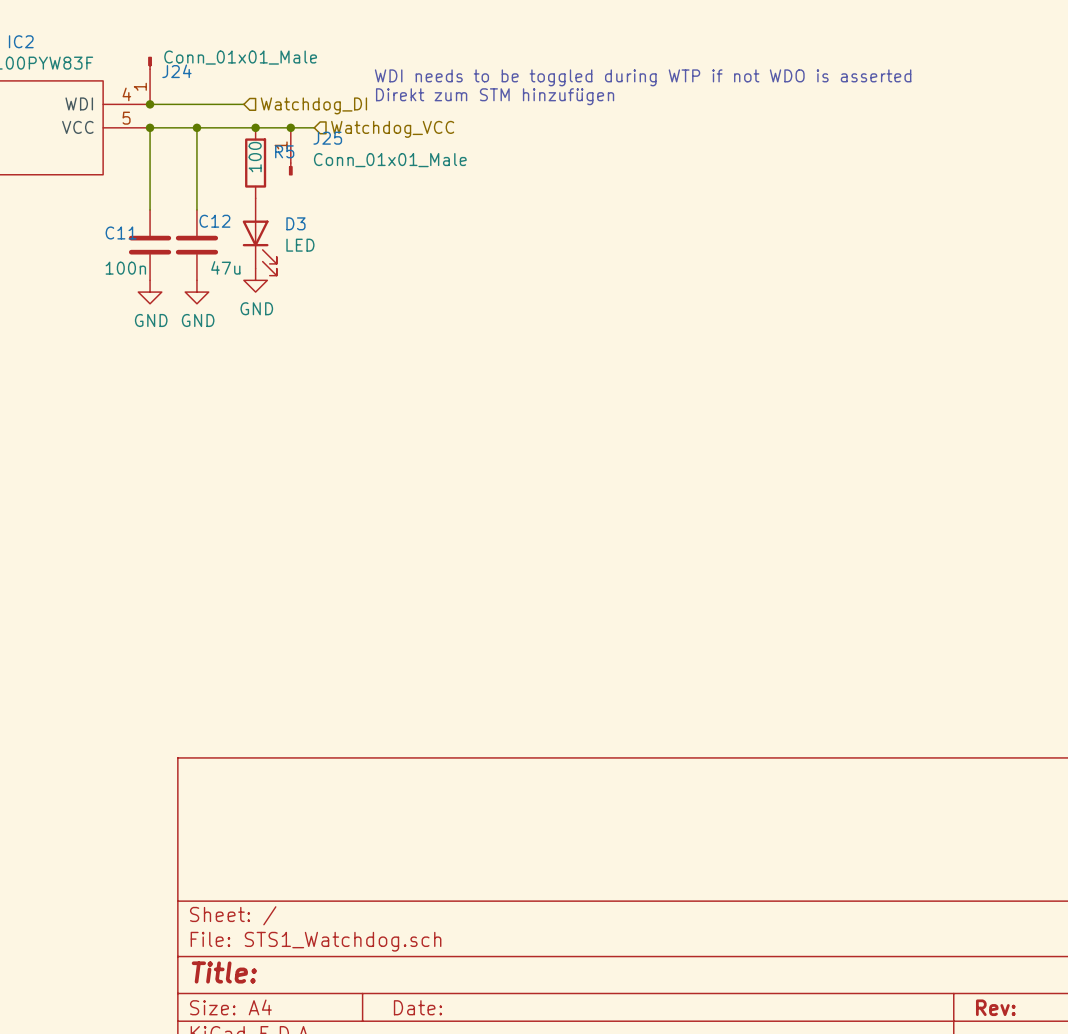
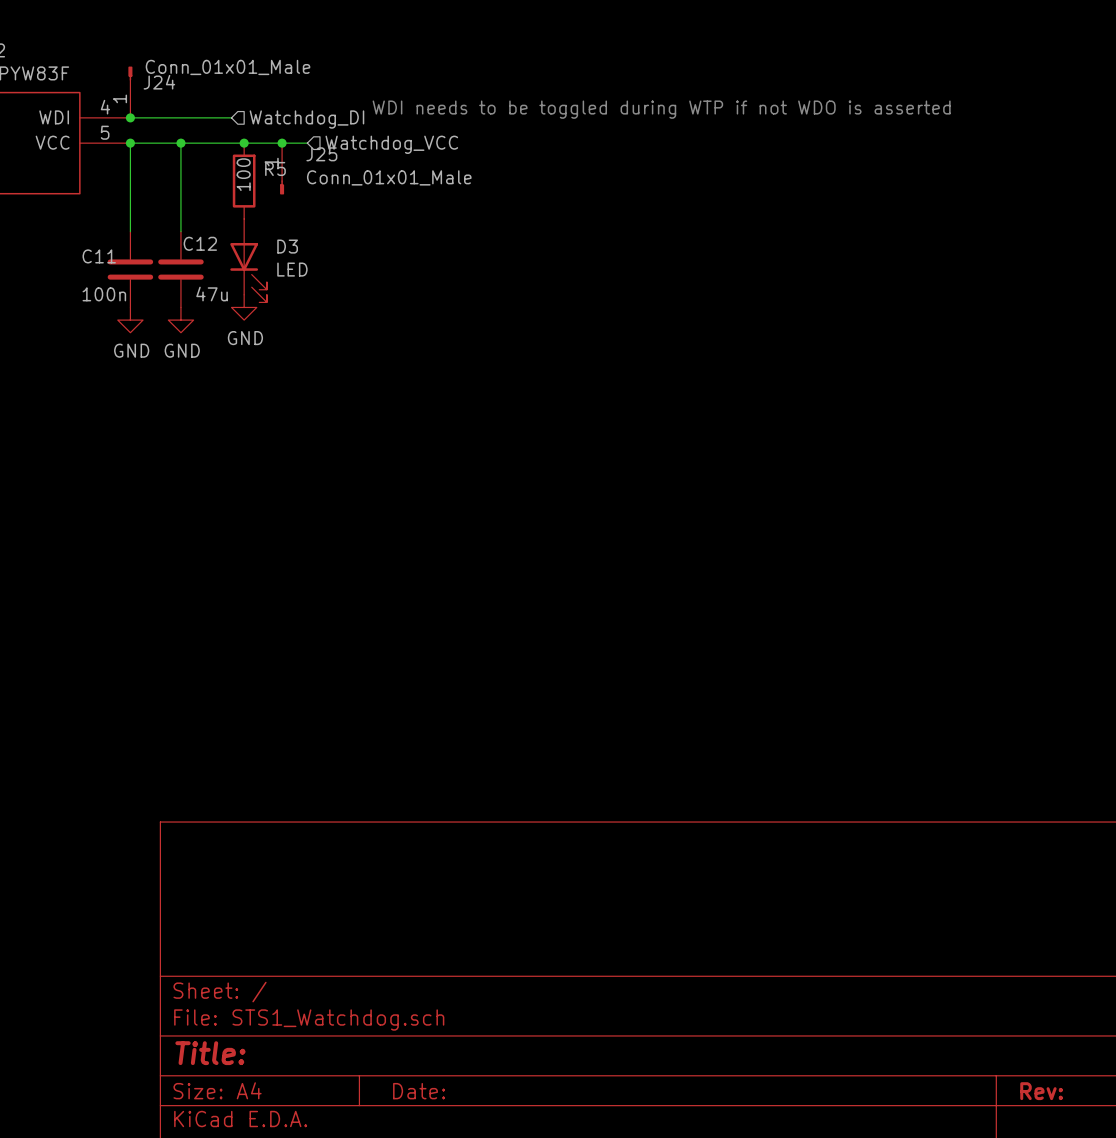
text: WDI needs to be toggled during WTP if not WDO is asserted (643, 77) -> none
text: Direkt zum STM hinzufügen (495, 96) -> WDI needs to be toggled during WTP if not WDO is asserted (661, 109)

